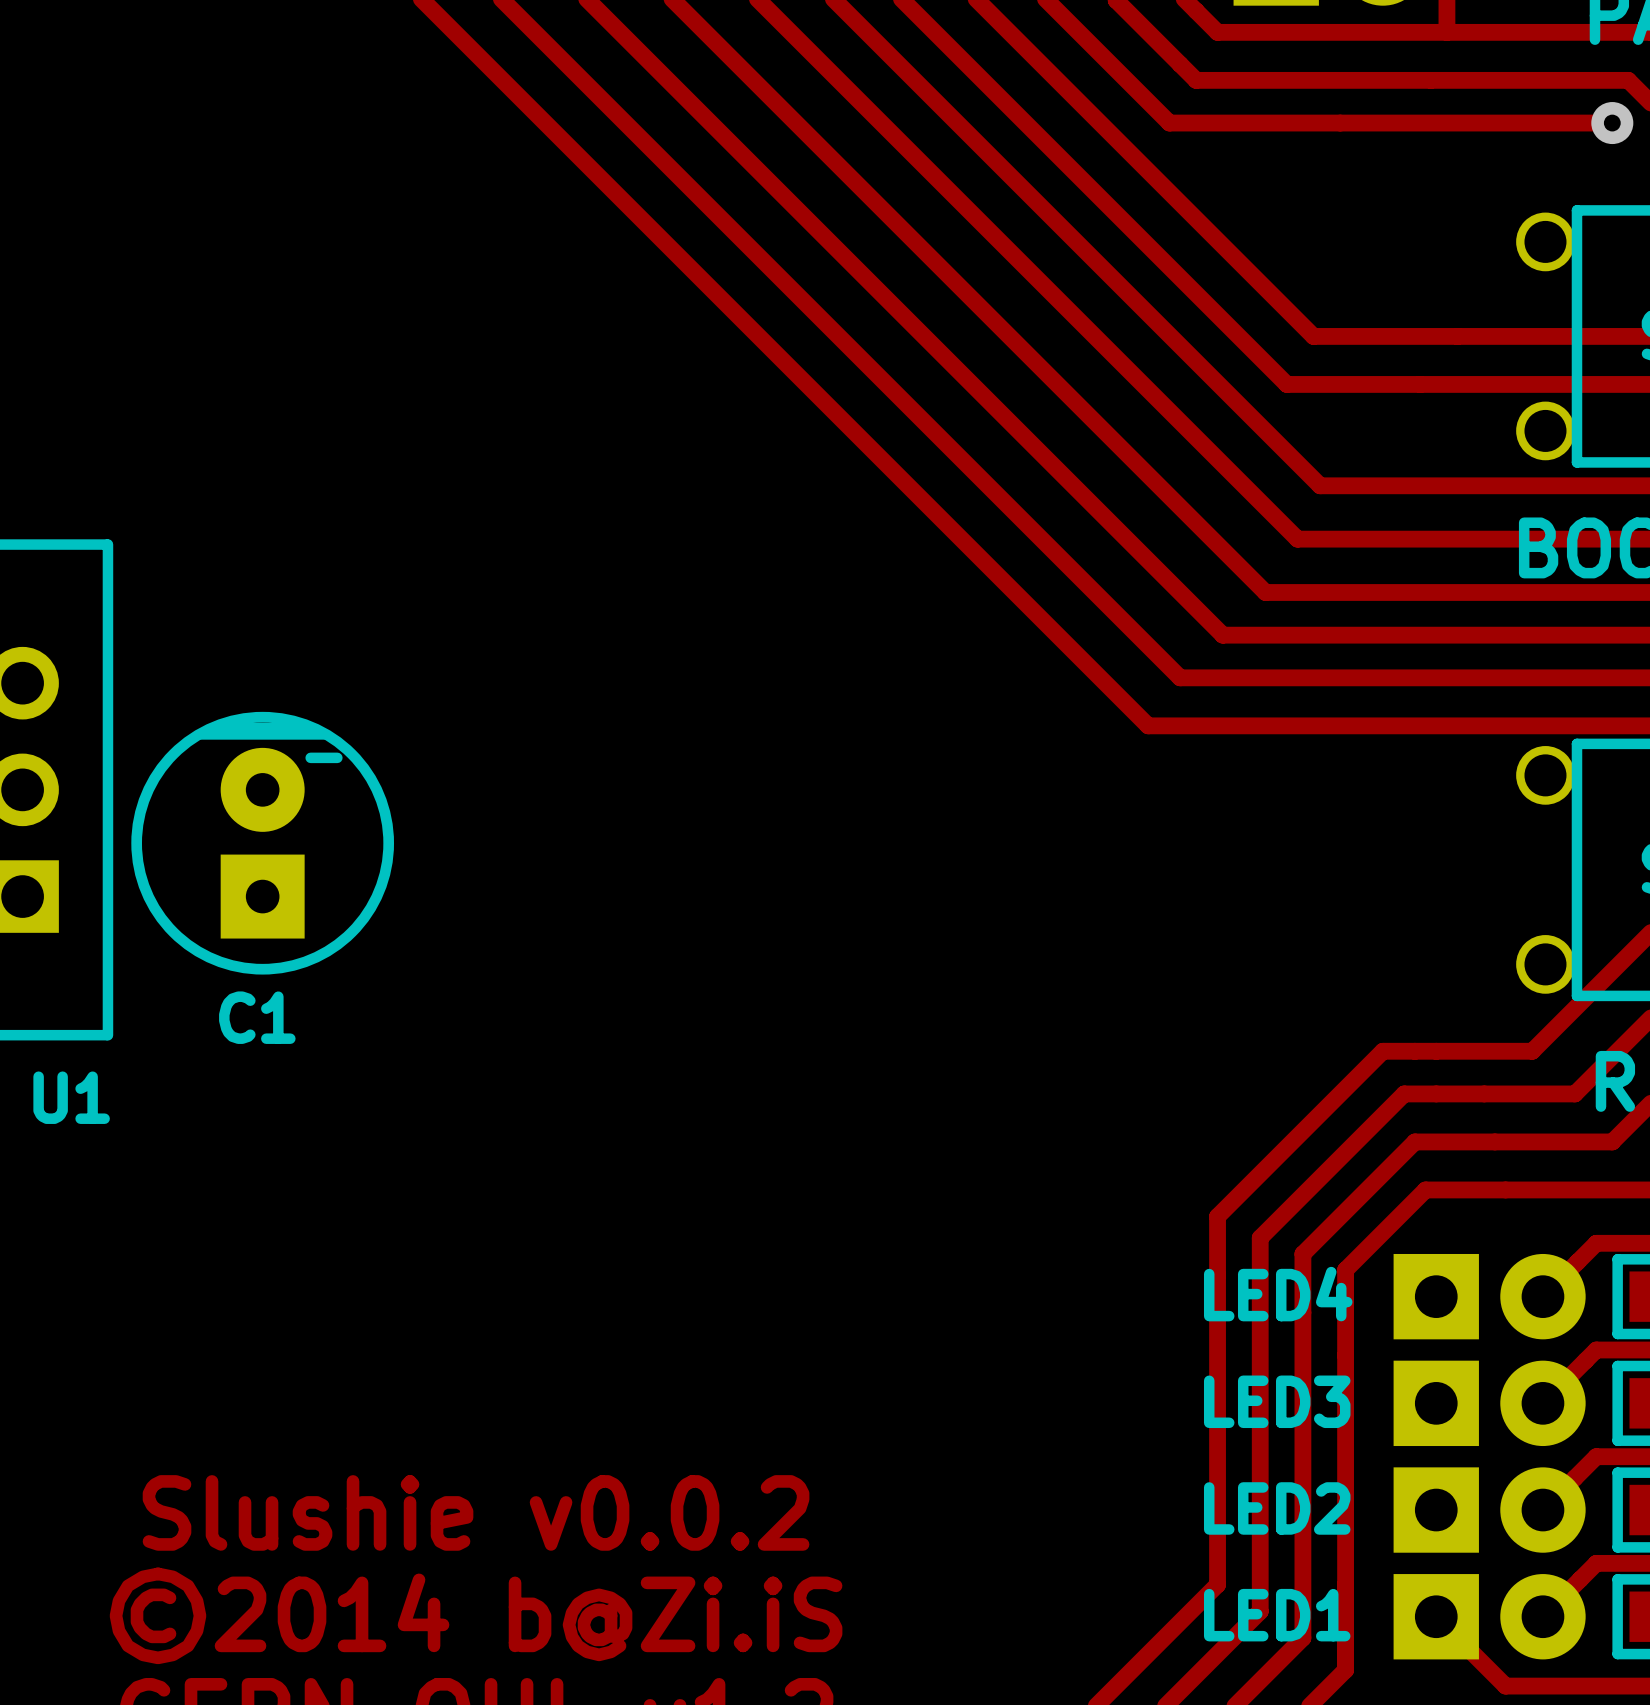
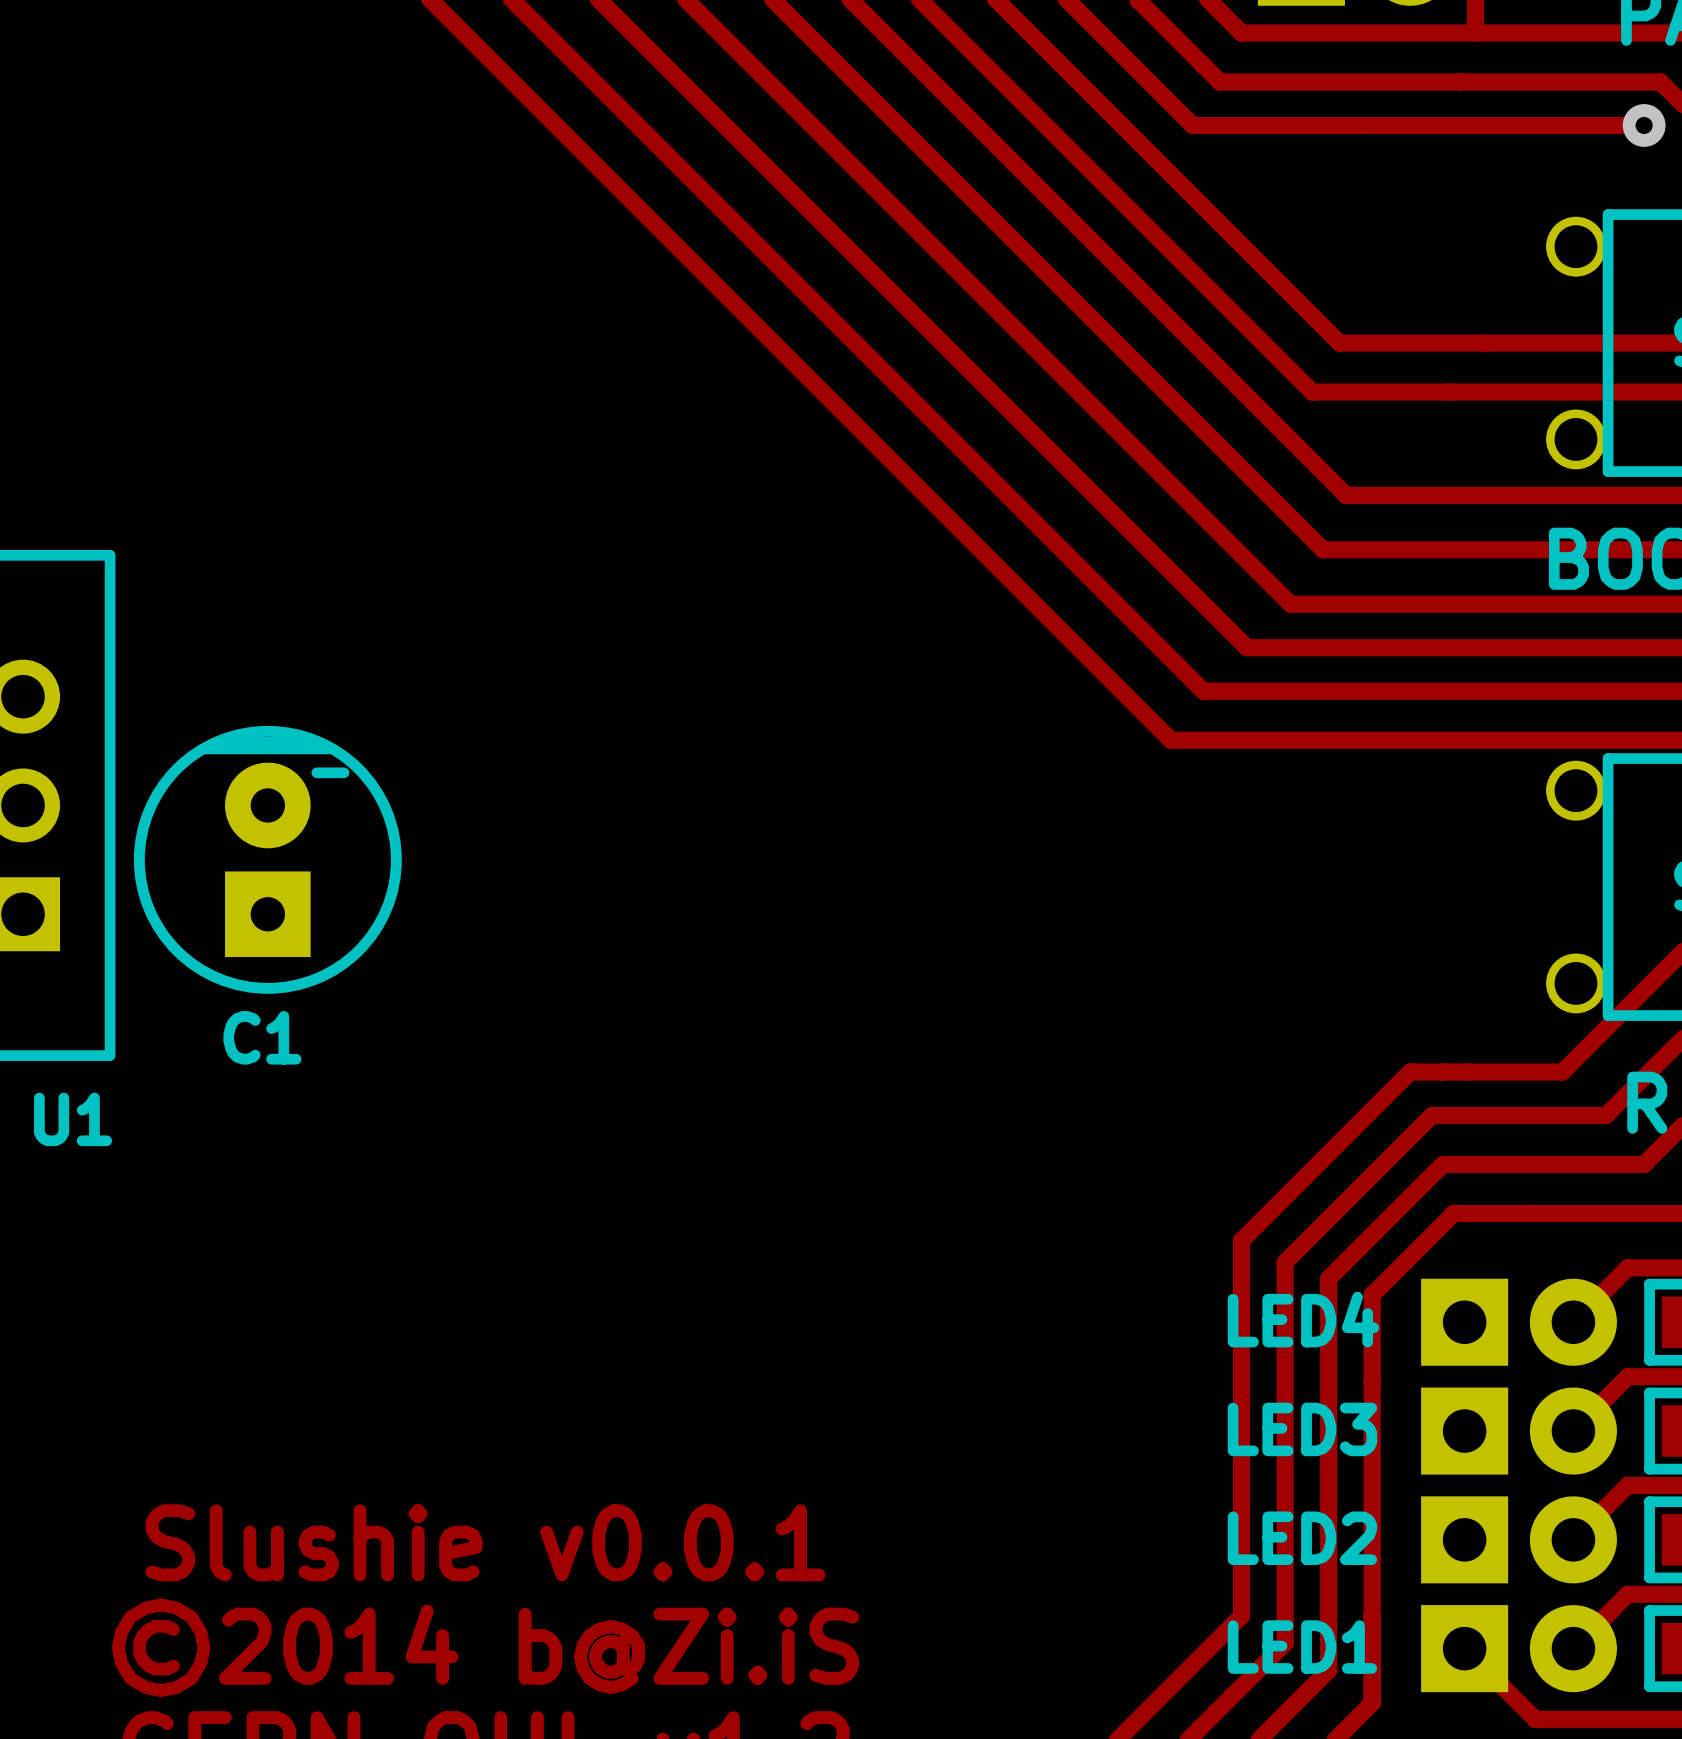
text: Slushie v0.0.2 (476, 1512) -> Slushie v0.0.1 (485, 1542)

